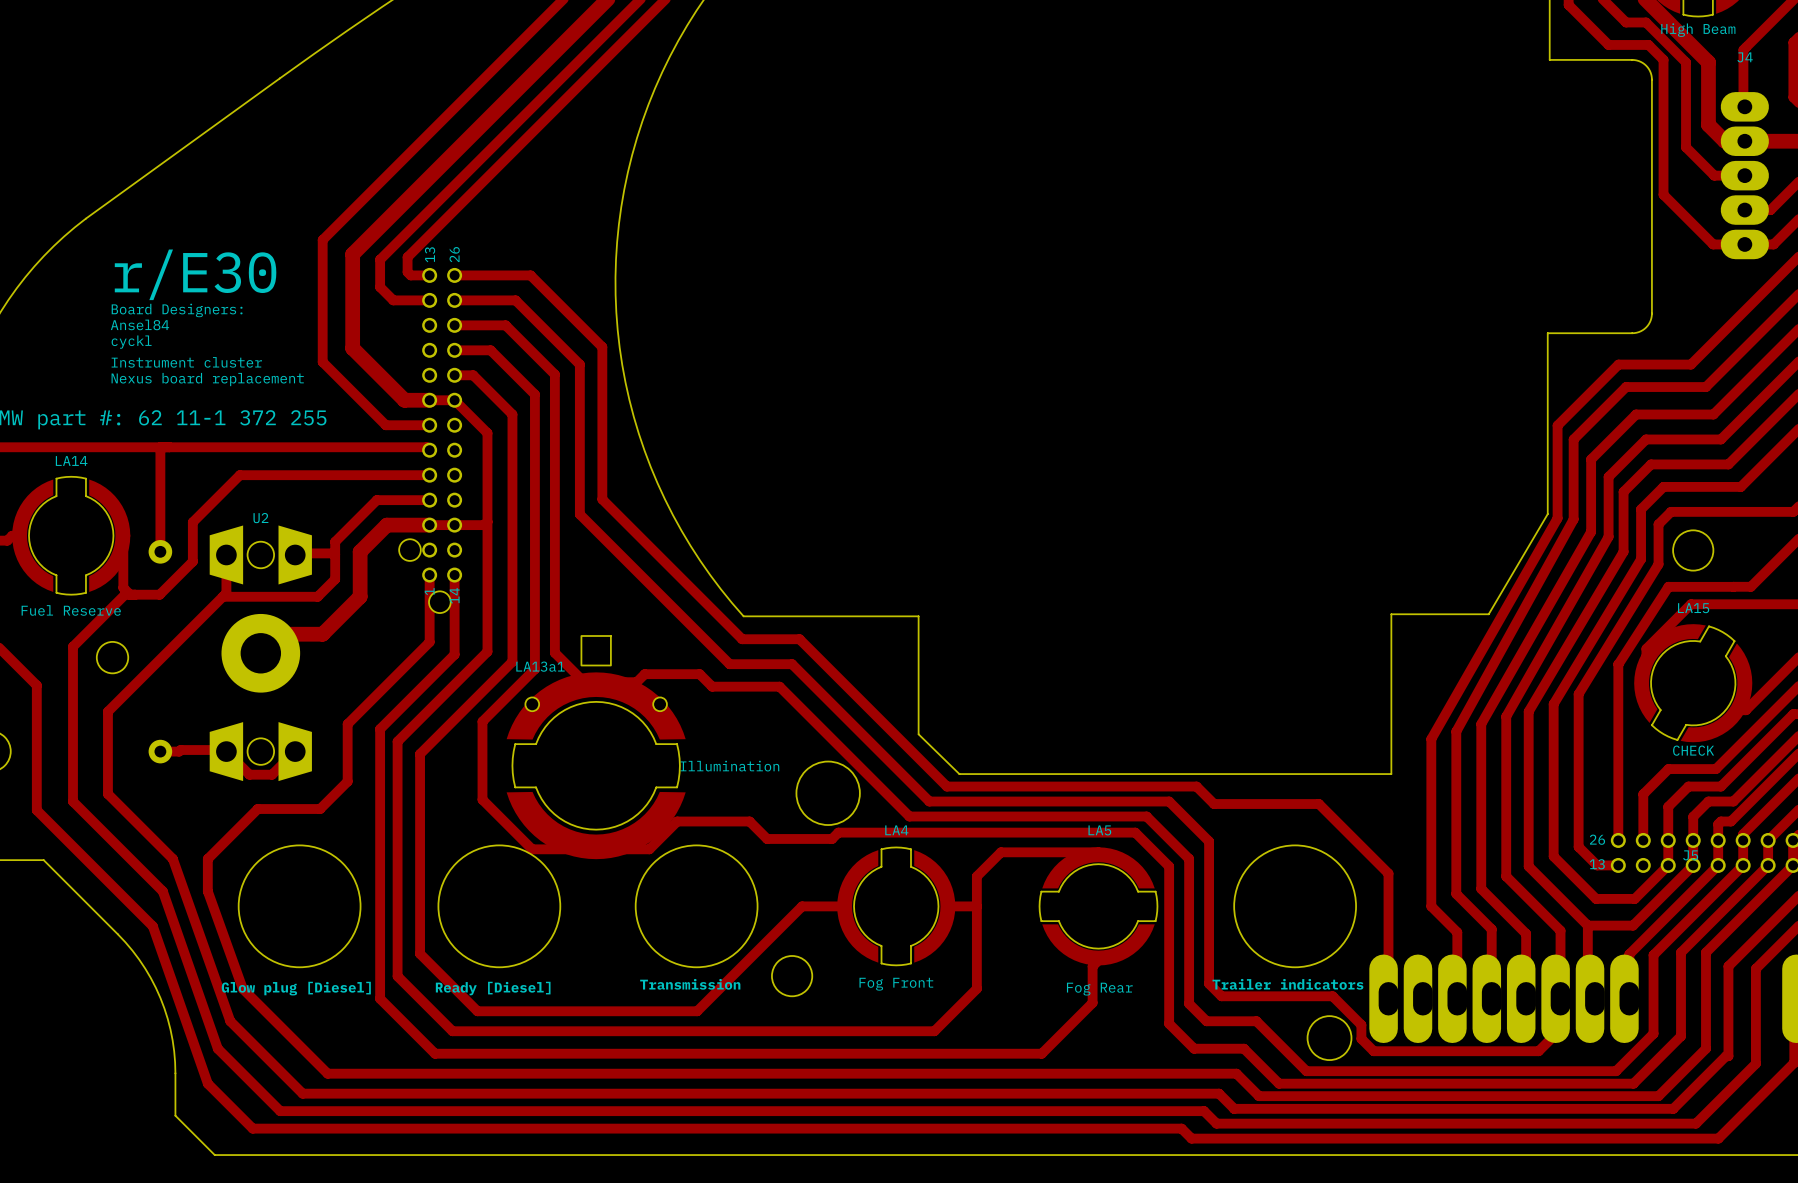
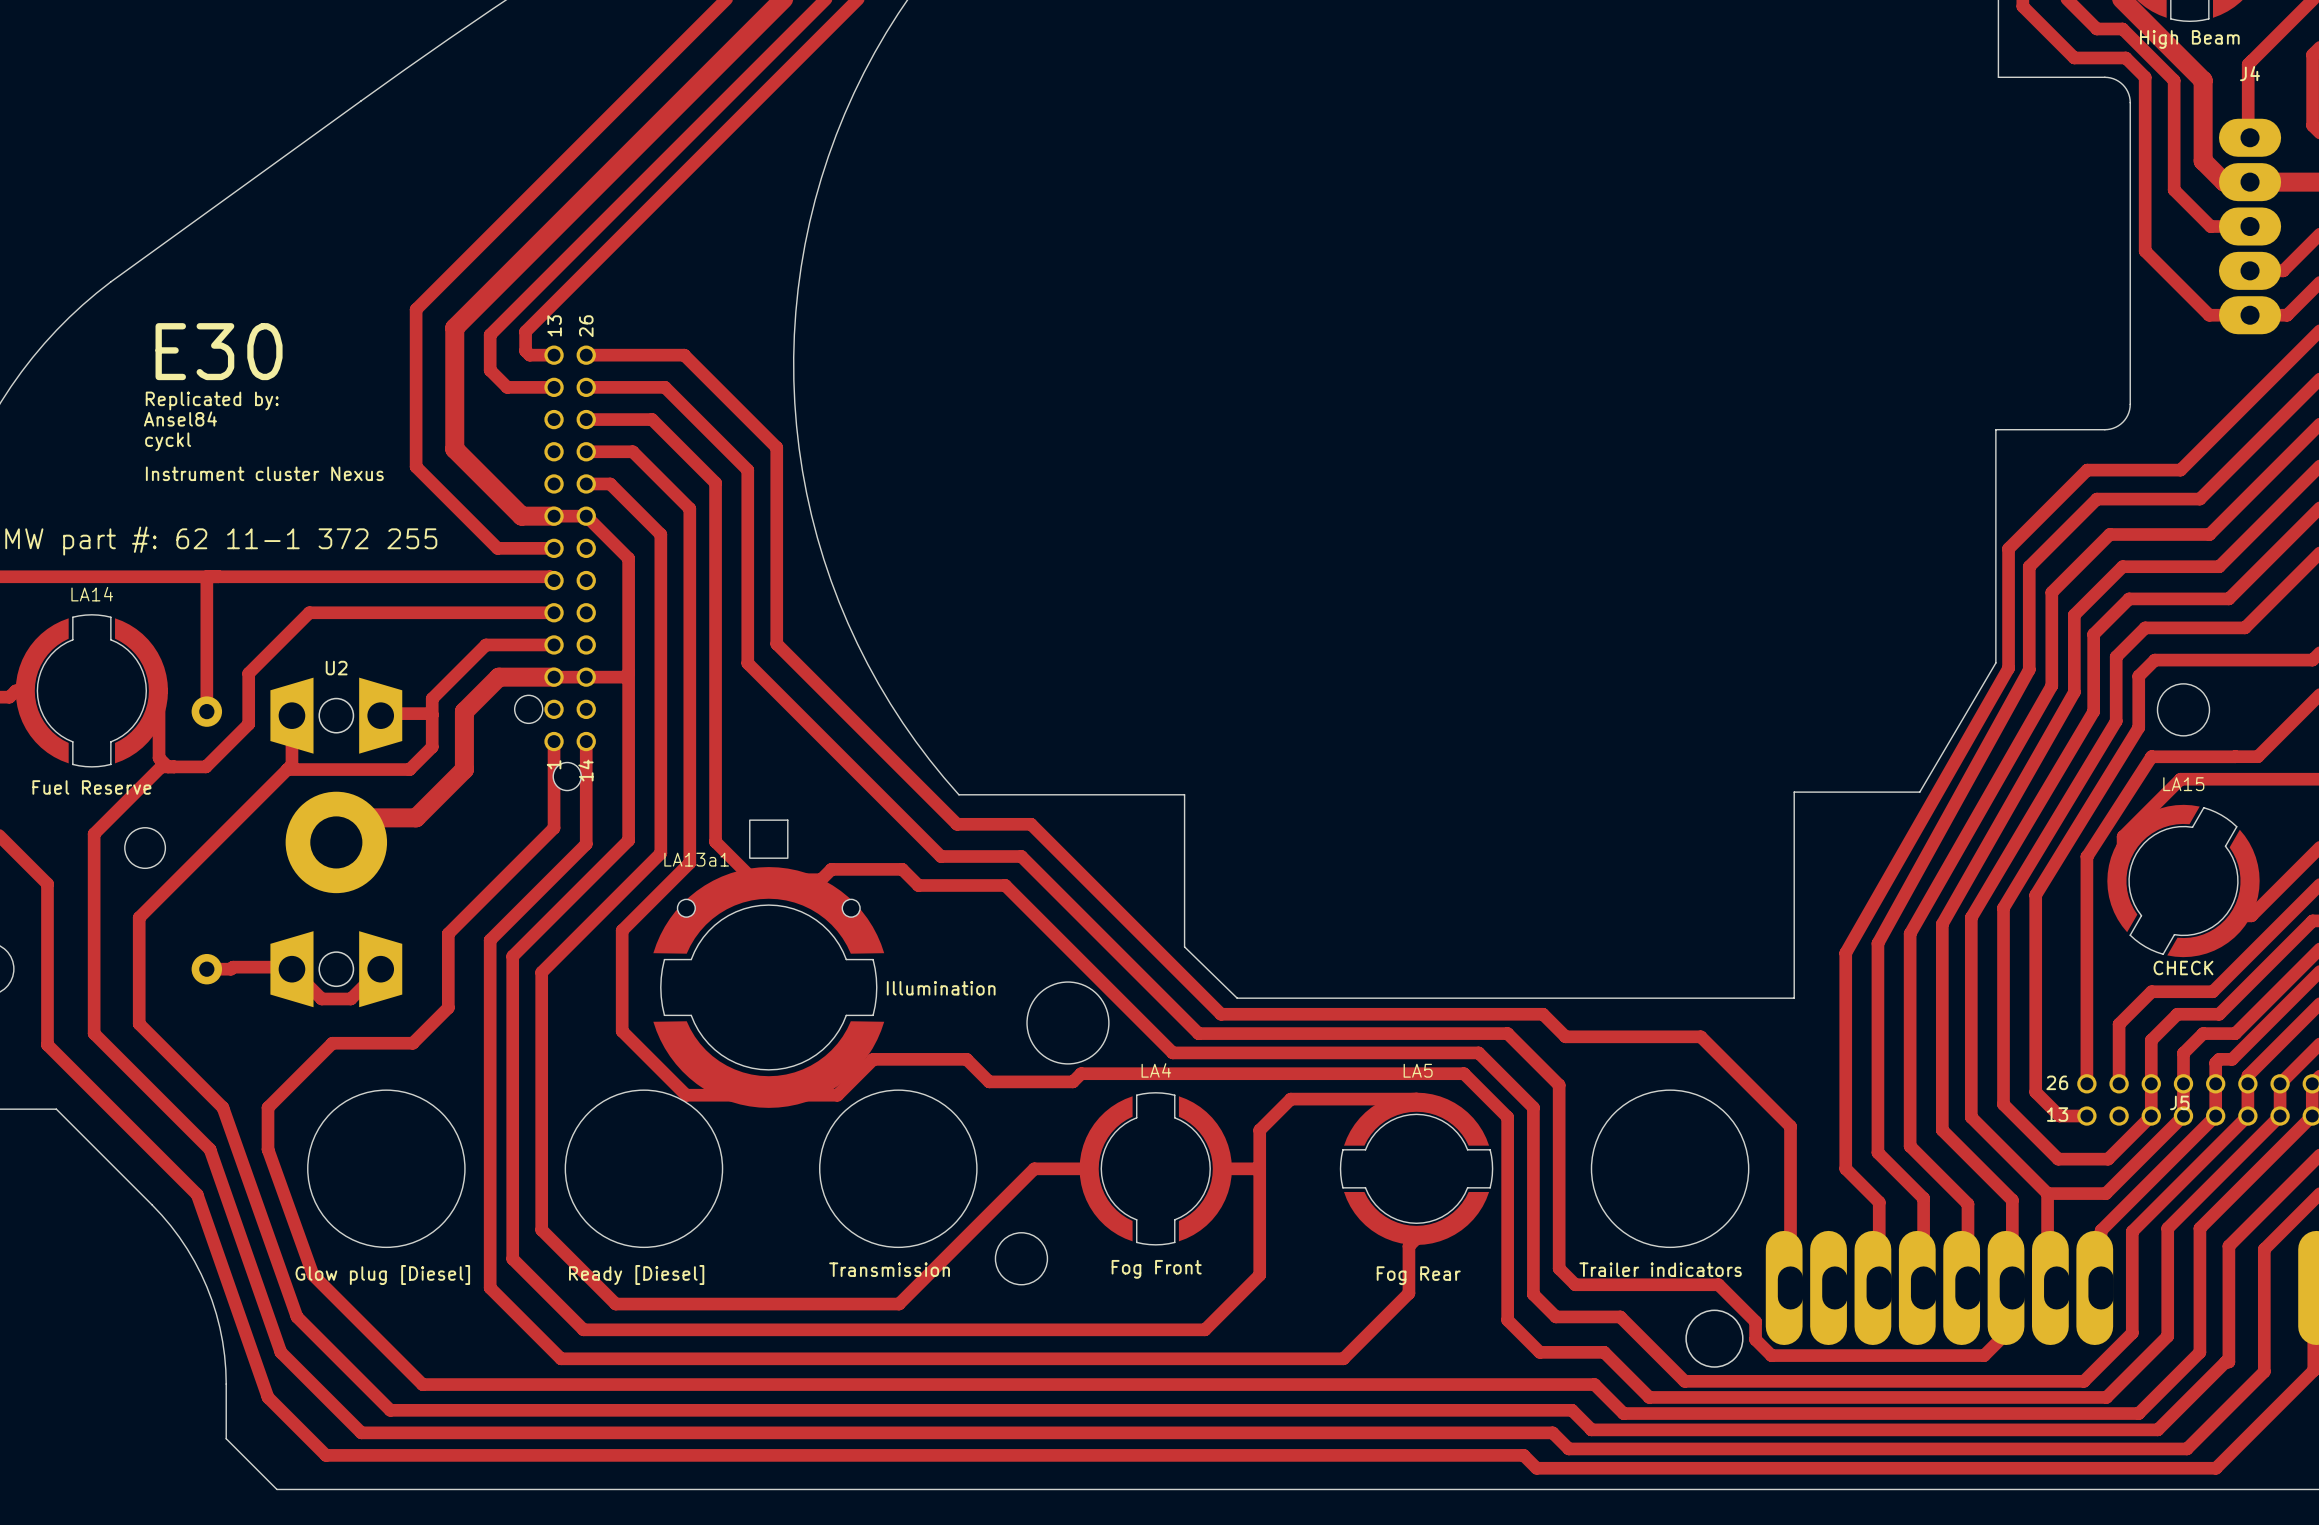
text: r/E30 (195, 274) -> E30 (219, 351)
text: Board Designers: (177, 310) -> Replicated by: (212, 400)
text: Instrument cluster (186, 362) -> Instrument cluster Nexus (264, 473)
text: Nexus board replacement (207, 379) -> none

